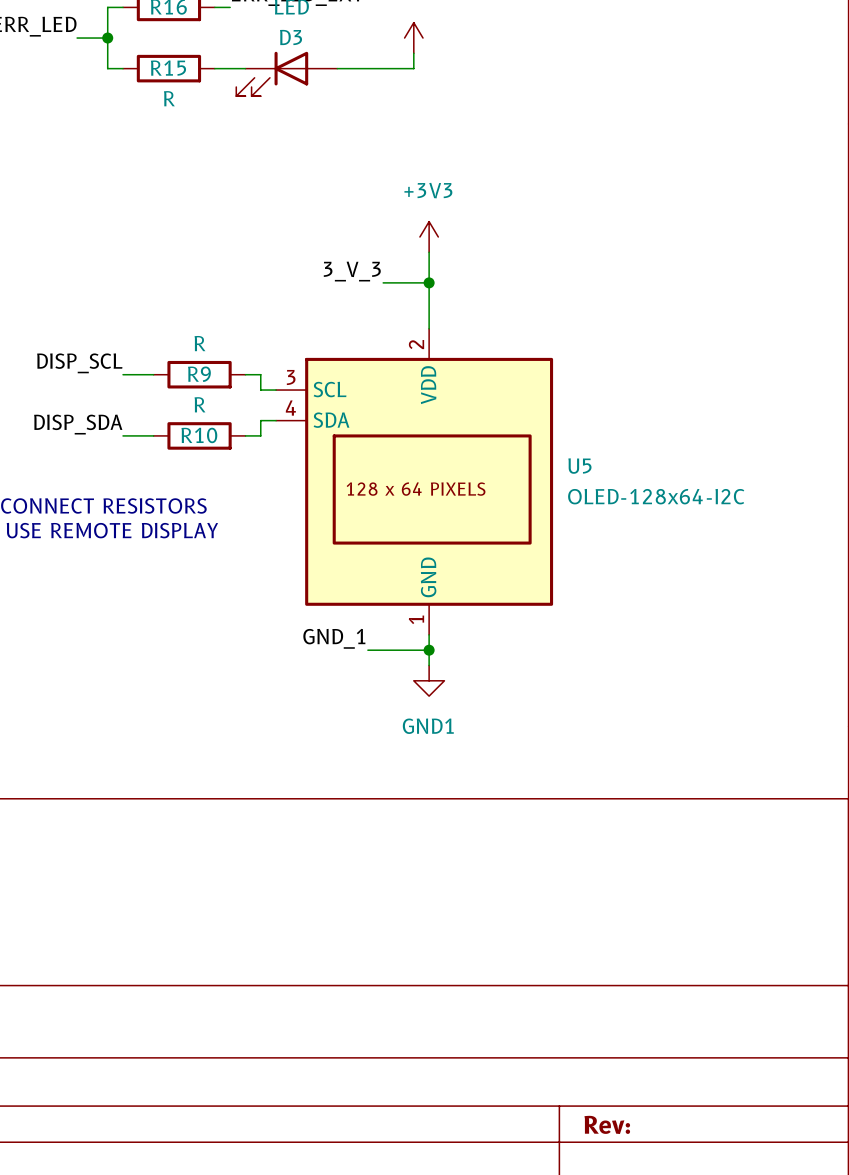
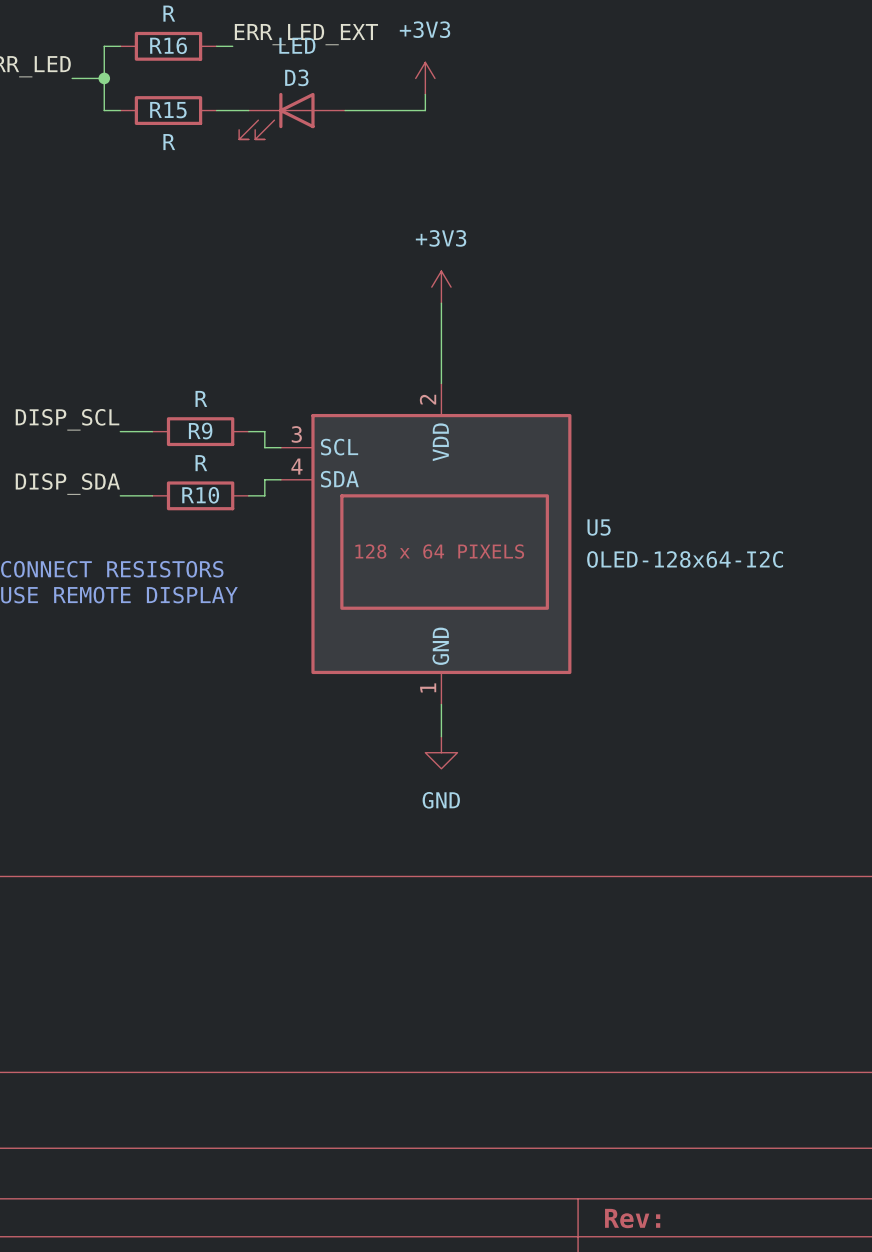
label: 3_V_3 (352, 271) -> none
wire: (383, 282) (429, 282) -> none
junction: (429, 282) -> none
label: GND_1 (334, 638) -> none
wire: (367, 650) (429, 650) -> none
junction: (429, 650) -> none
power symbol: GND1 (429, 680) -> GND (441, 752)

